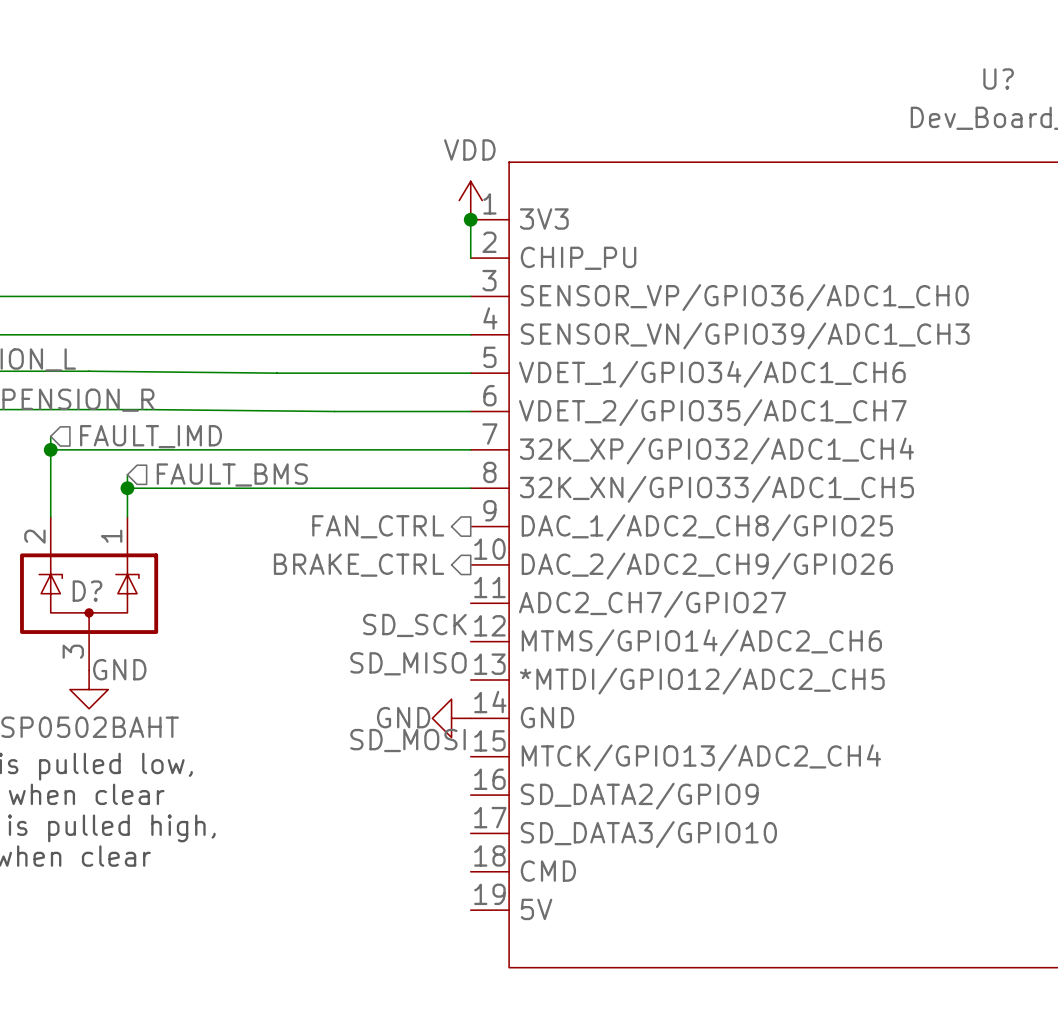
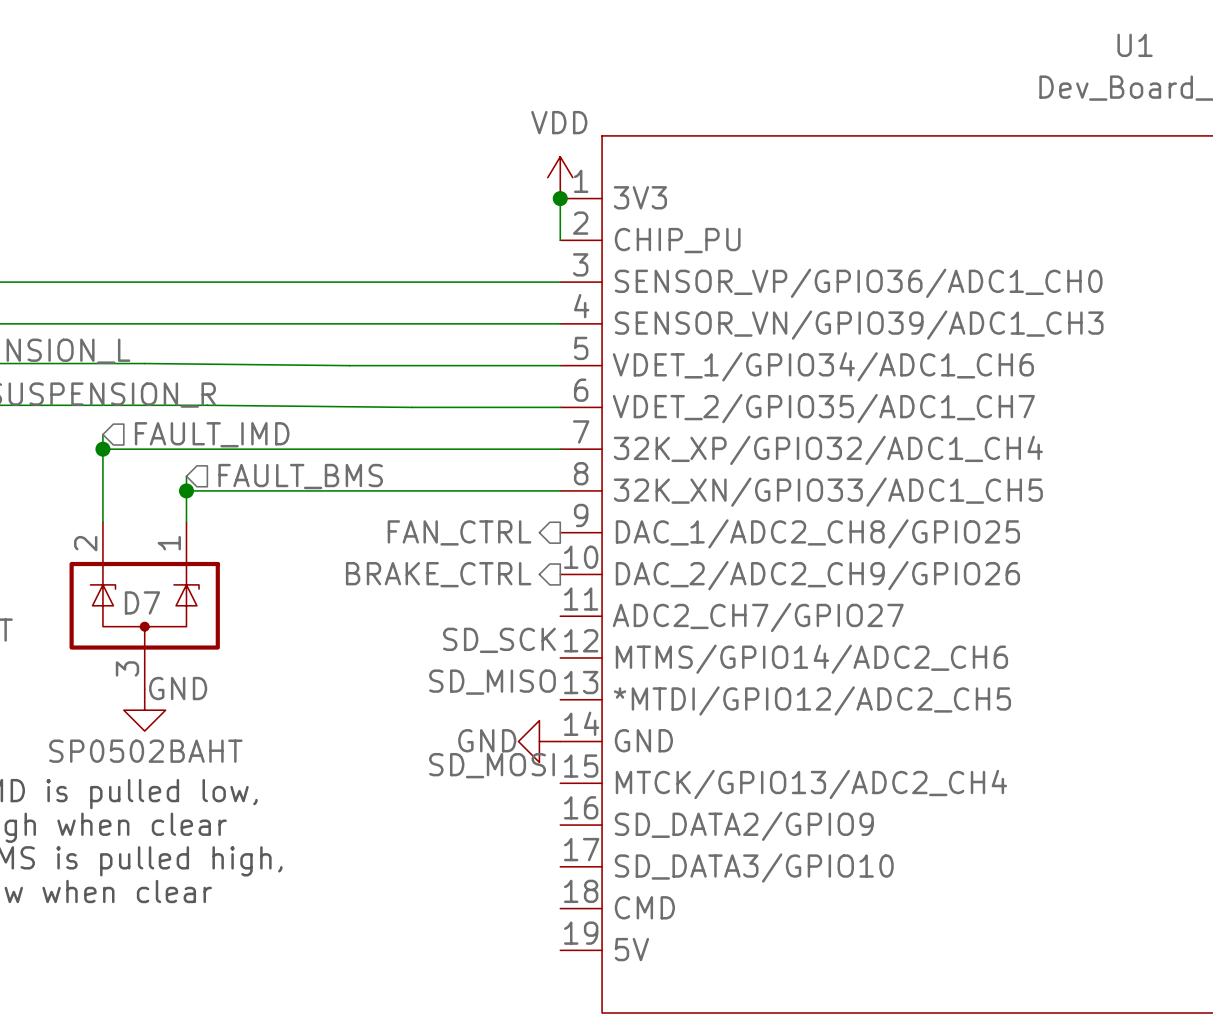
U? name: U? (998, 79) -> U1 (1135, 45)
D? name: D? (87, 591) -> D7 (142, 602)

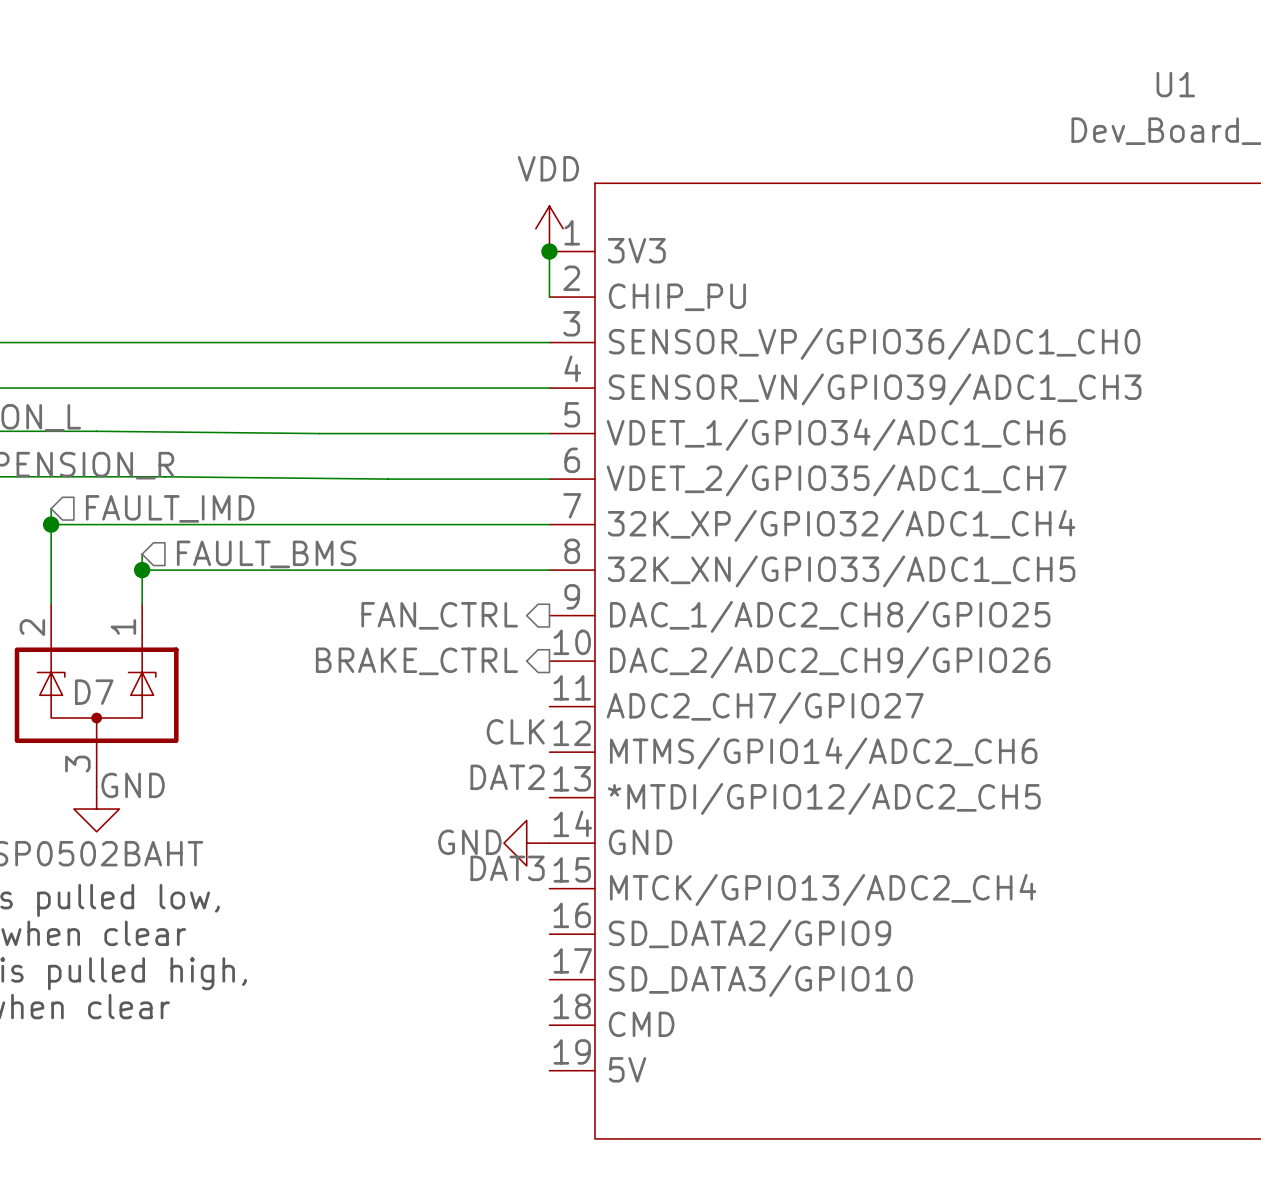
label: SD_SCK (499, 640) -> CLK (515, 731)
label: SD_MISO (492, 682) -> DAT2 (507, 777)
label: SD_MOSI (492, 765) -> DAT3 (507, 868)

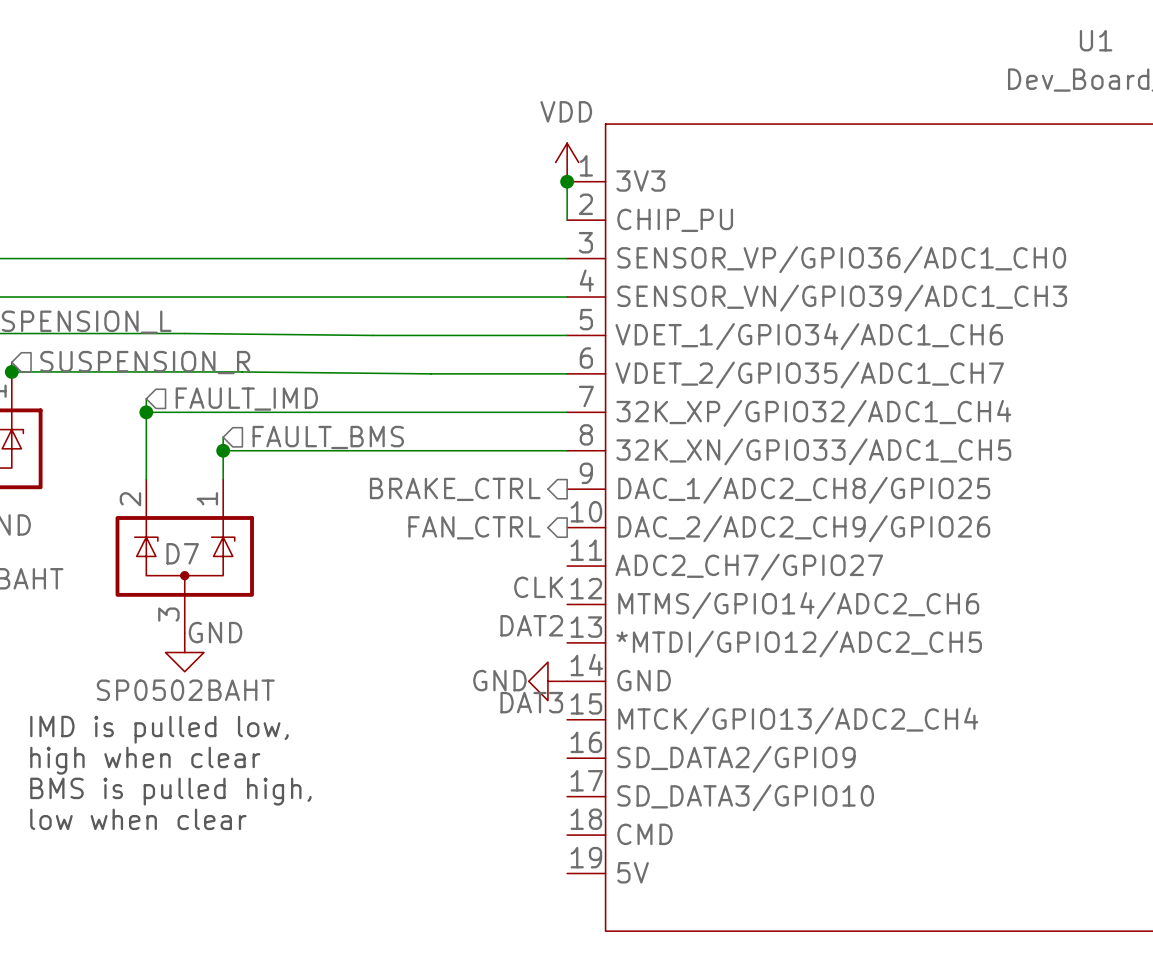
hierarchical label: FAN_CTRL (439, 615) -> BRAKE_CTRL (455, 489)
hierarchical label: BRAKE_CTRL (416, 661) -> FAN_CTRL (474, 527)

